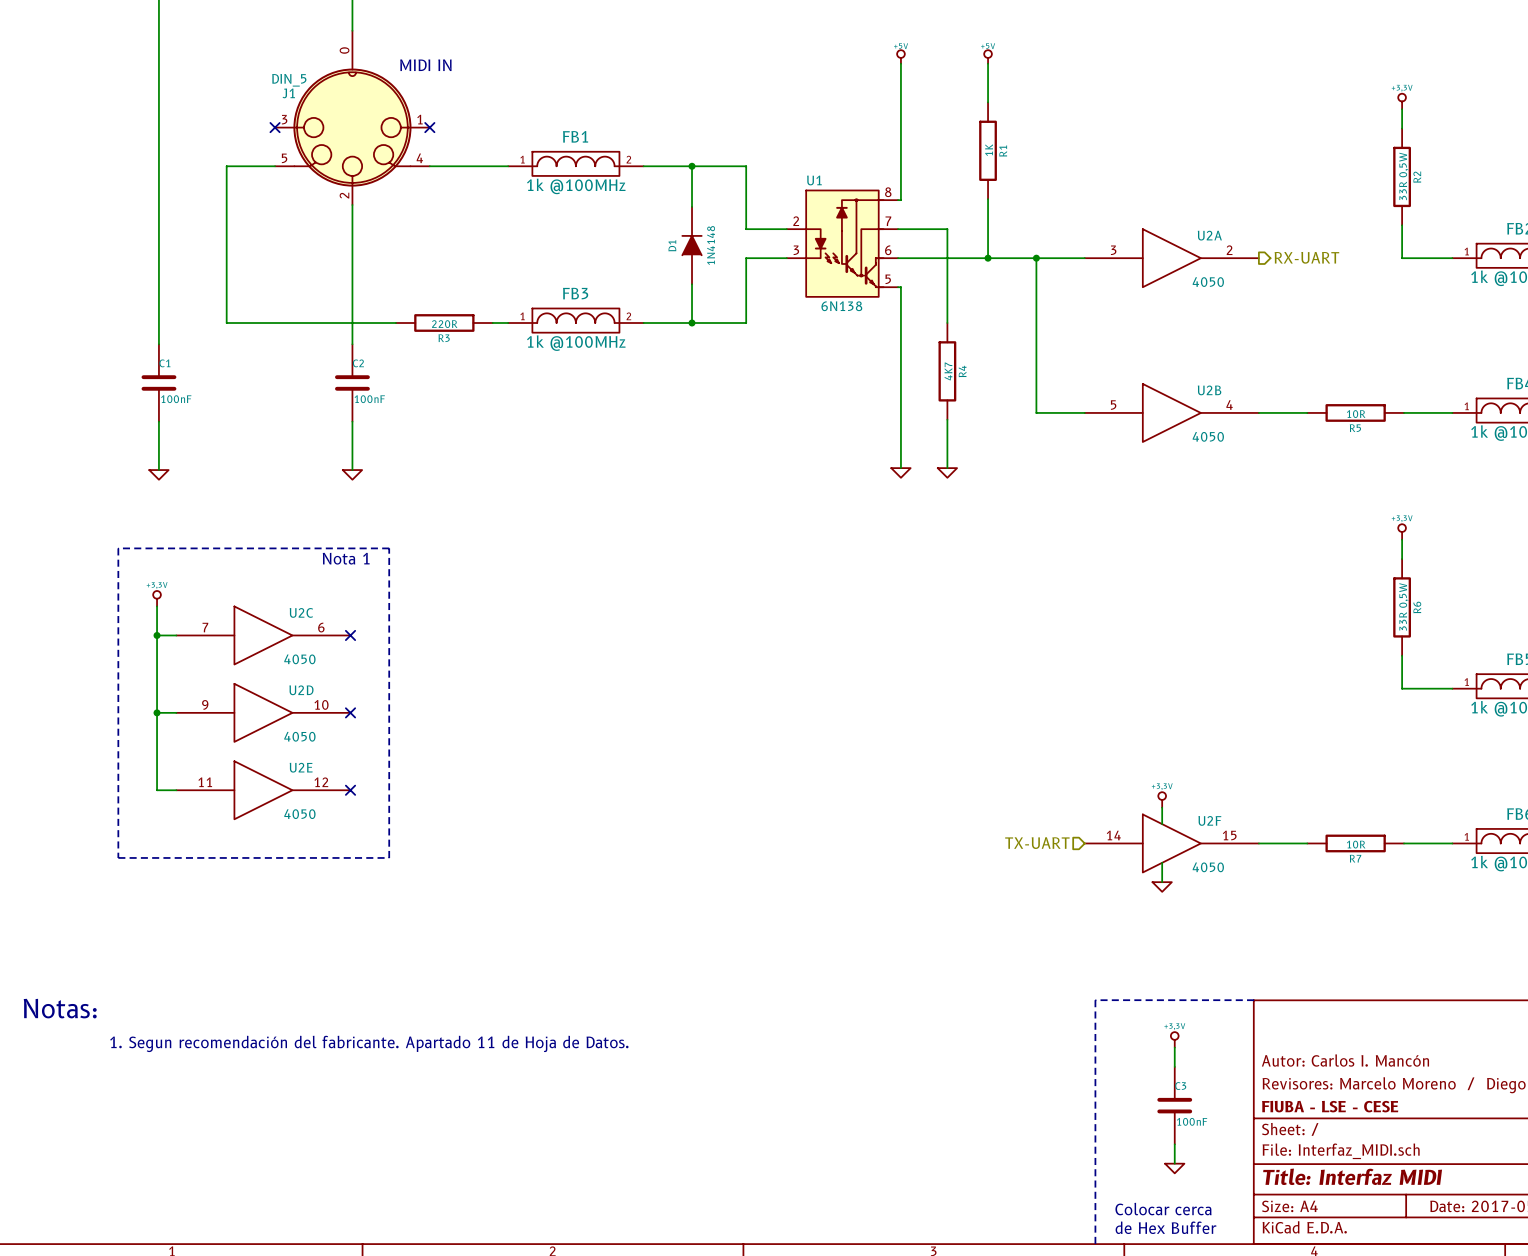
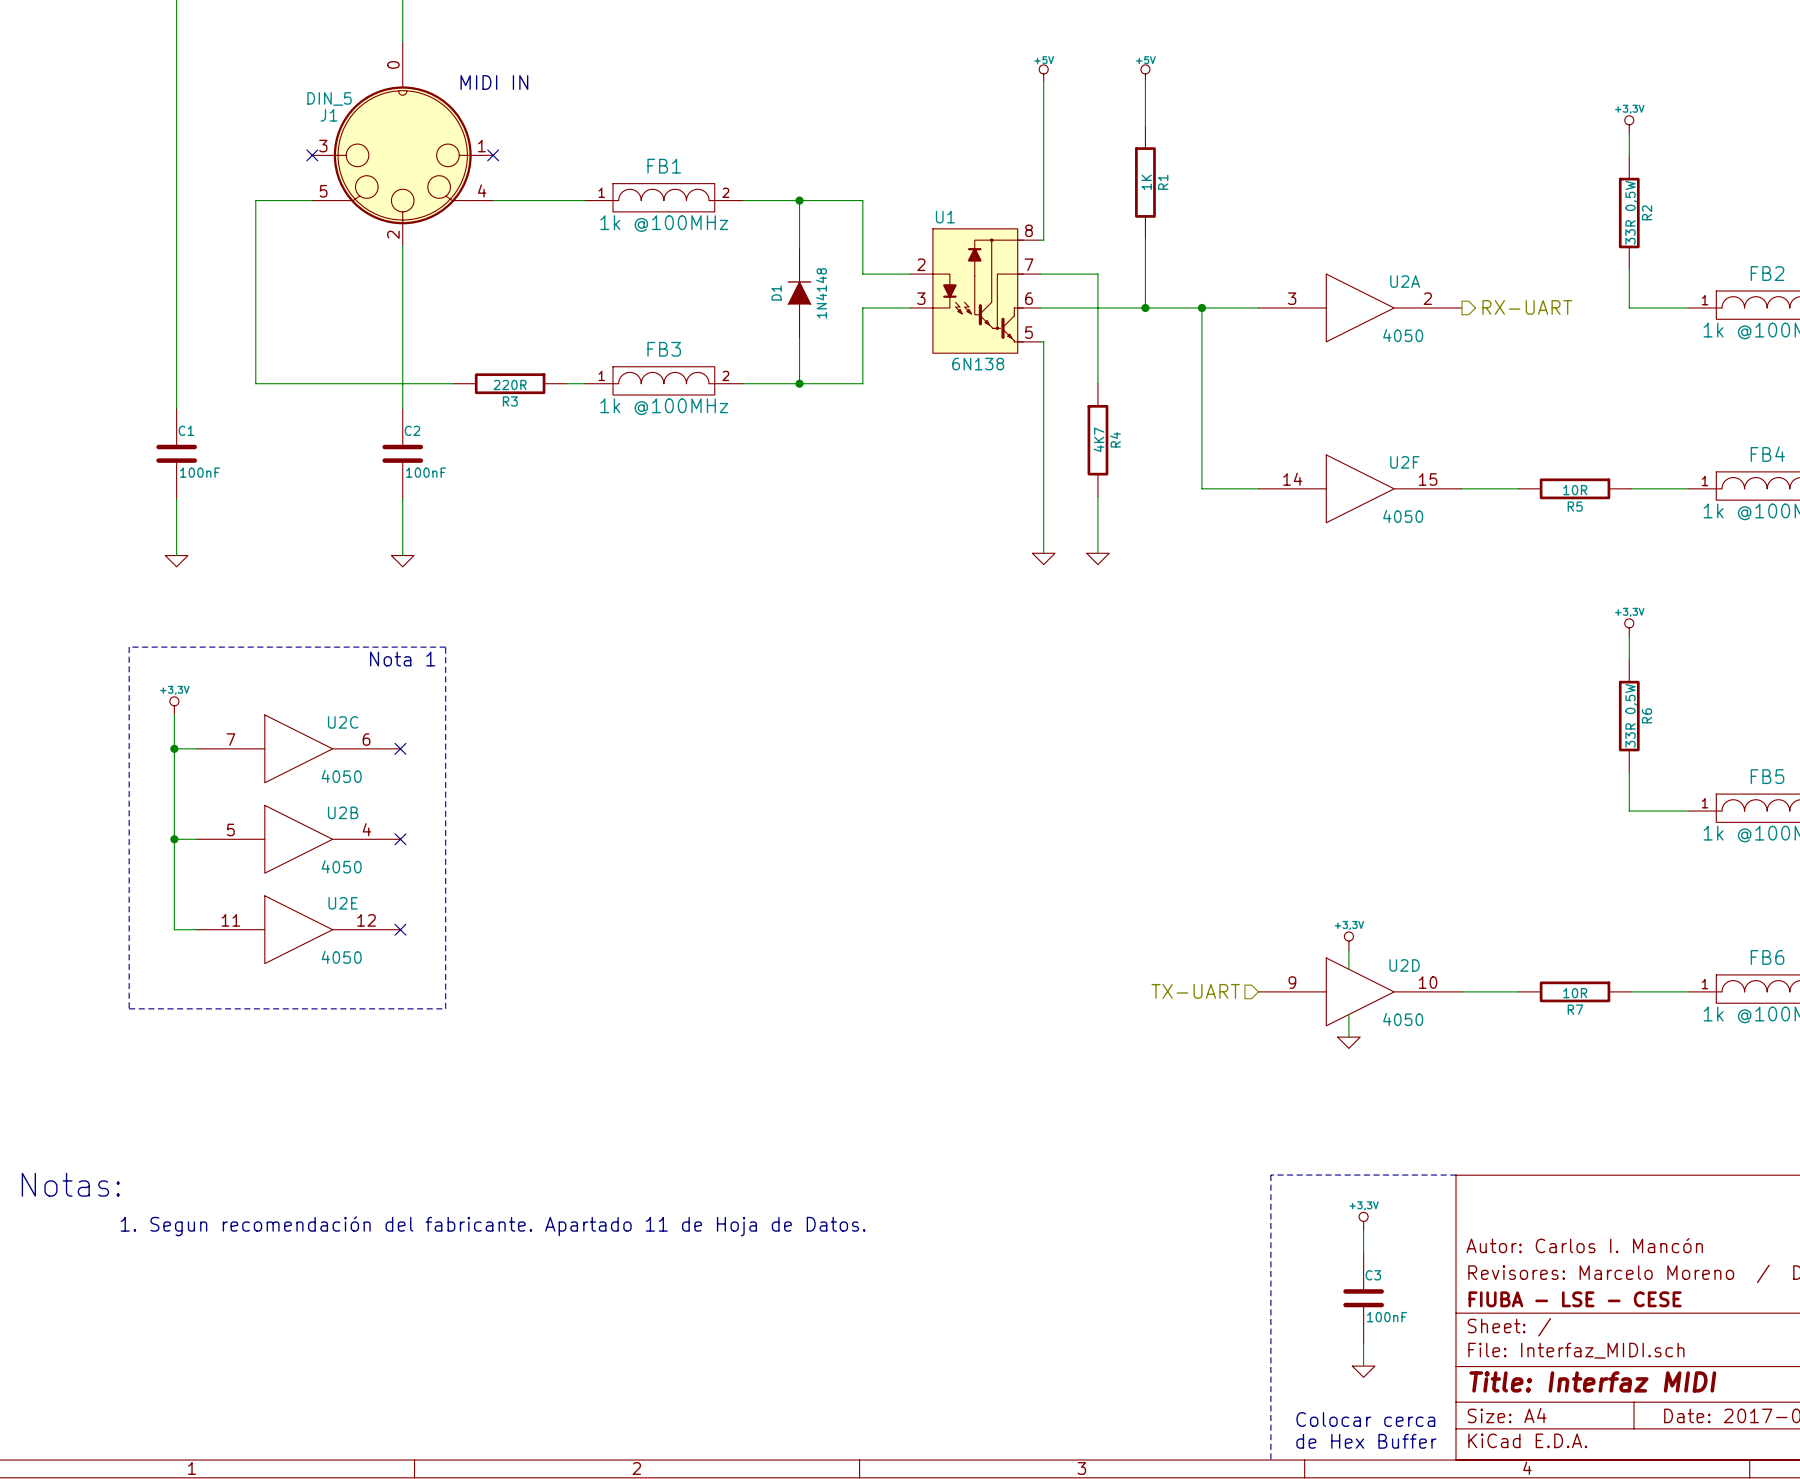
U2B position: (1171, 412) -> (298, 839)
U2D position: (263, 712) -> (1360, 991)
U2F position: (1171, 843) -> (1360, 488)

